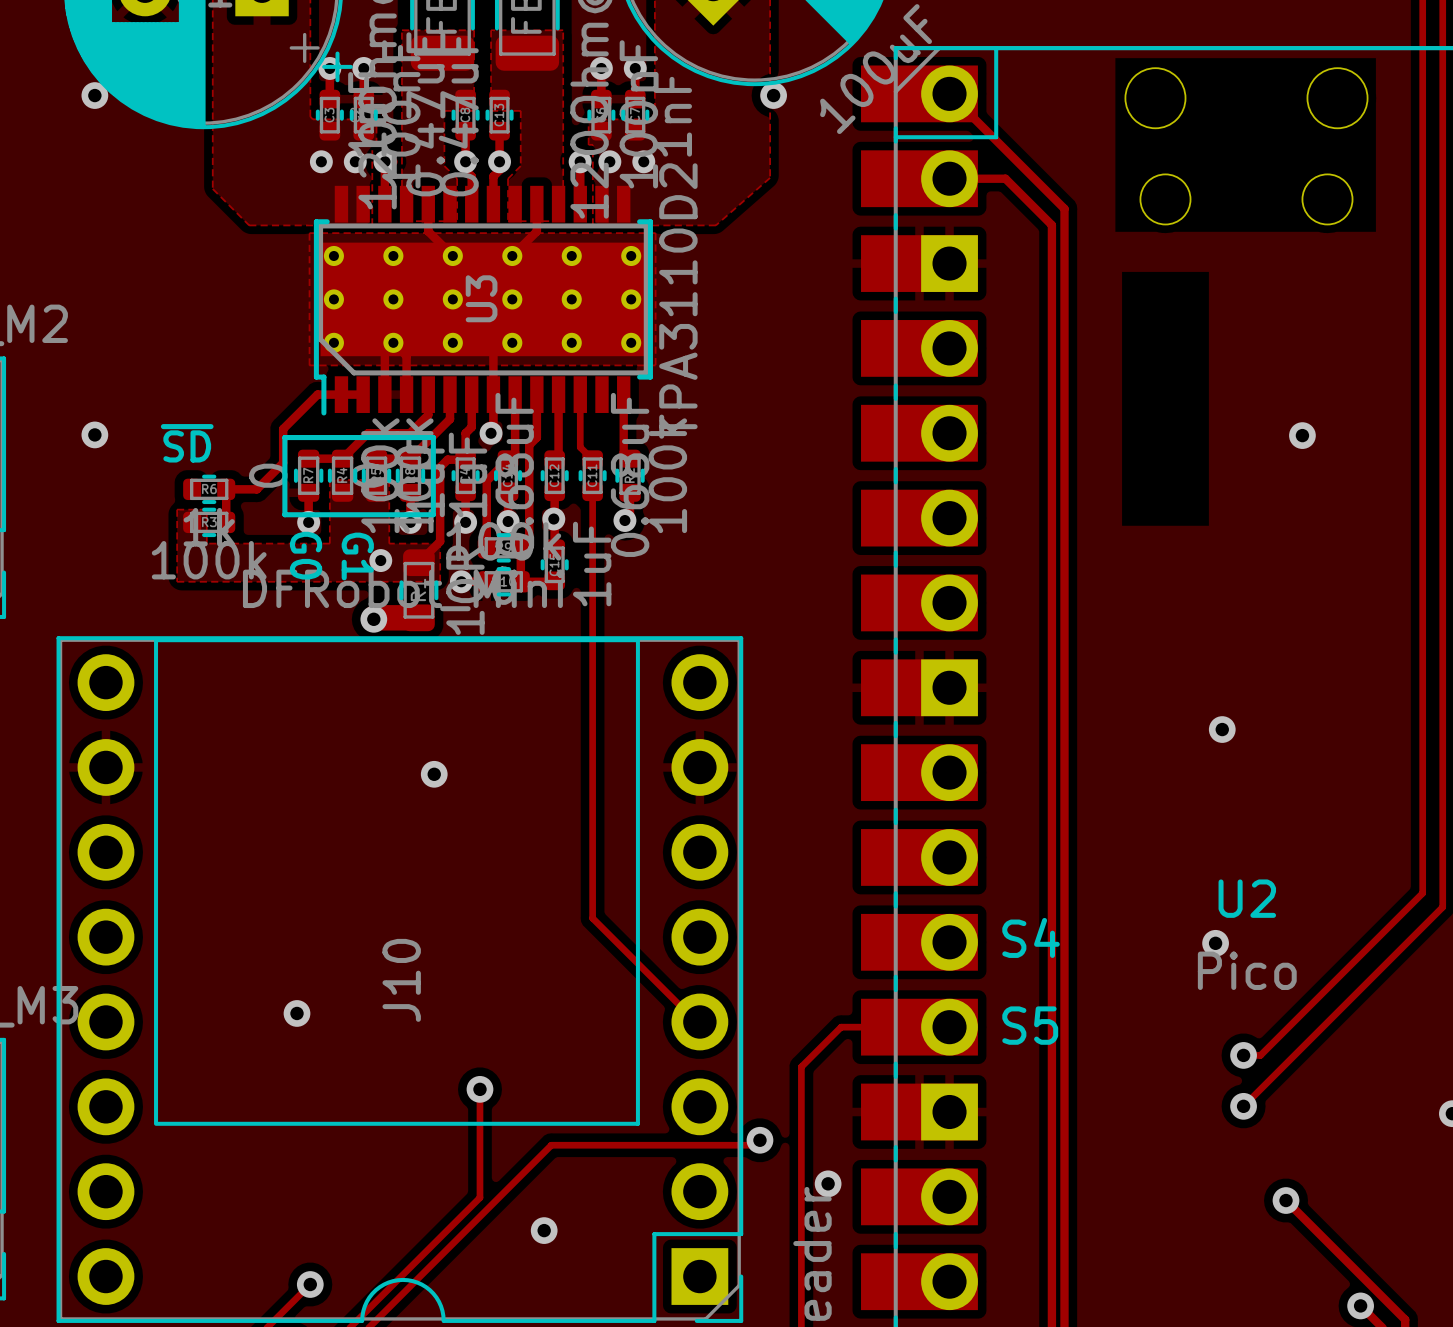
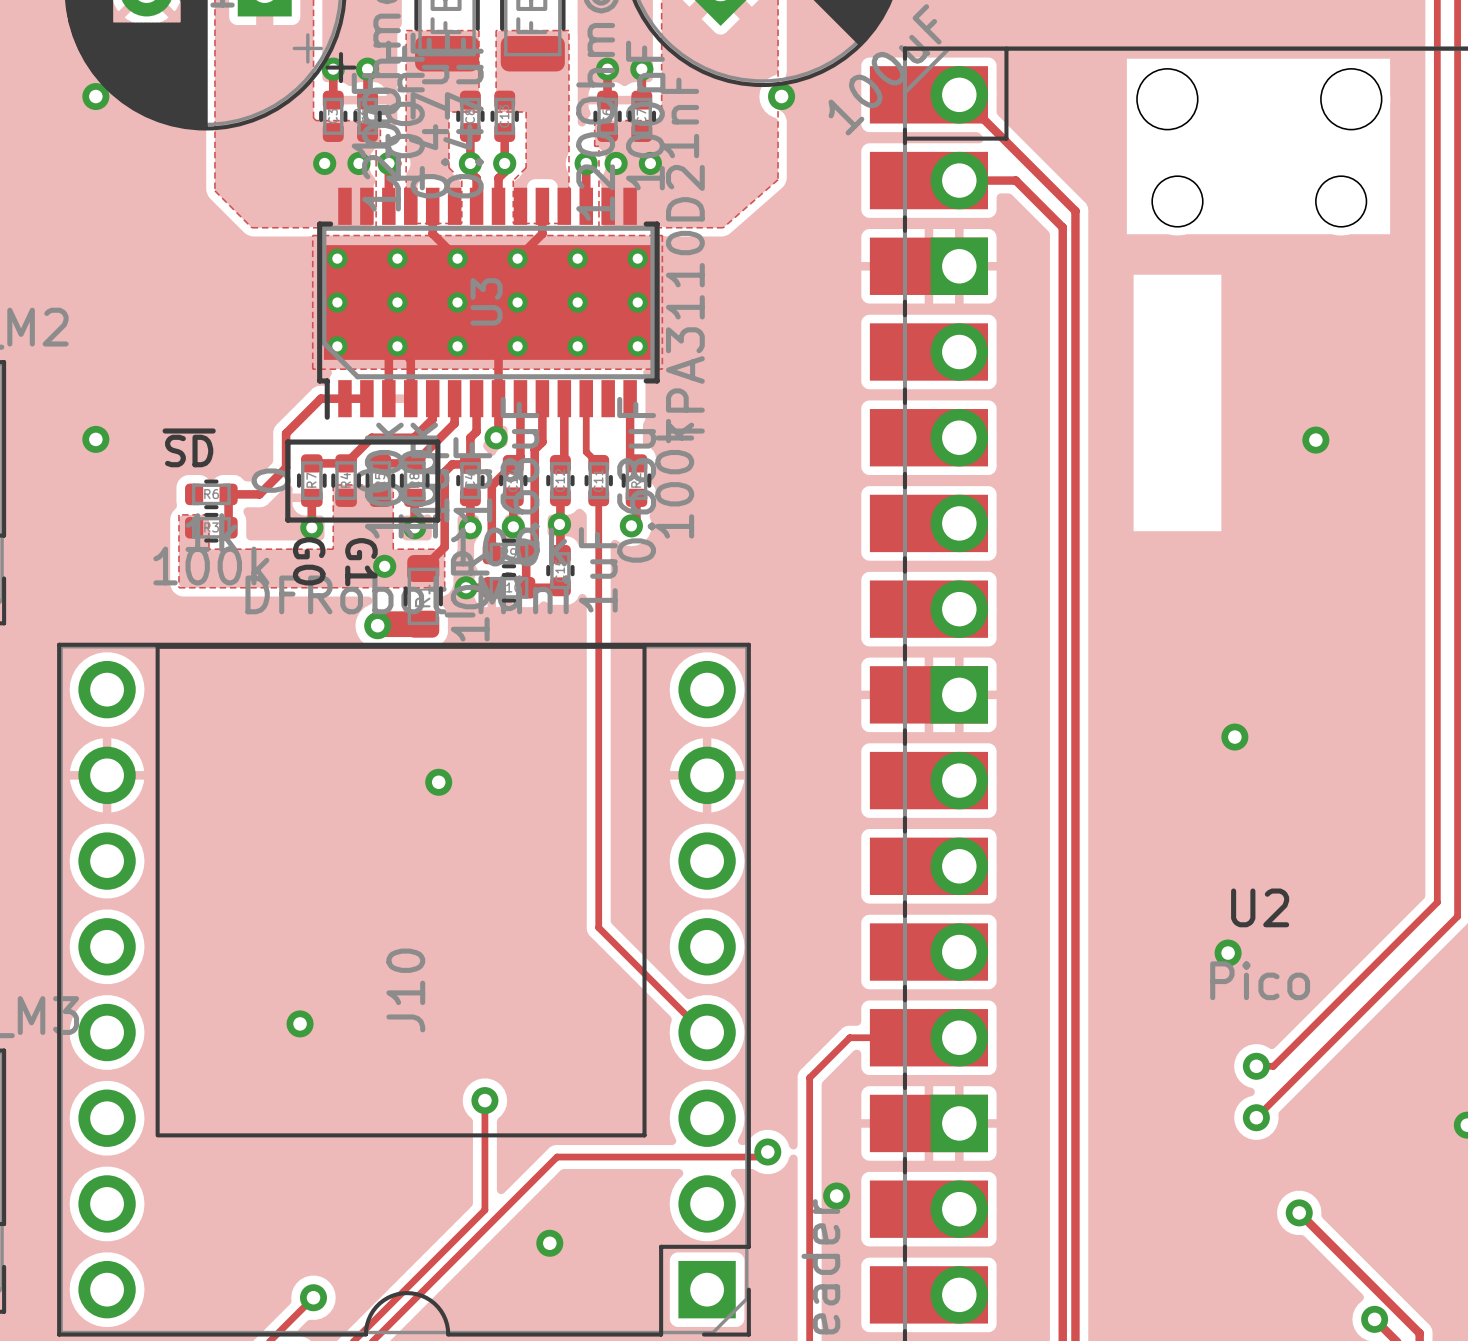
text: S4 (1031, 937) -> none
text: S5 (1030, 1025) -> none

